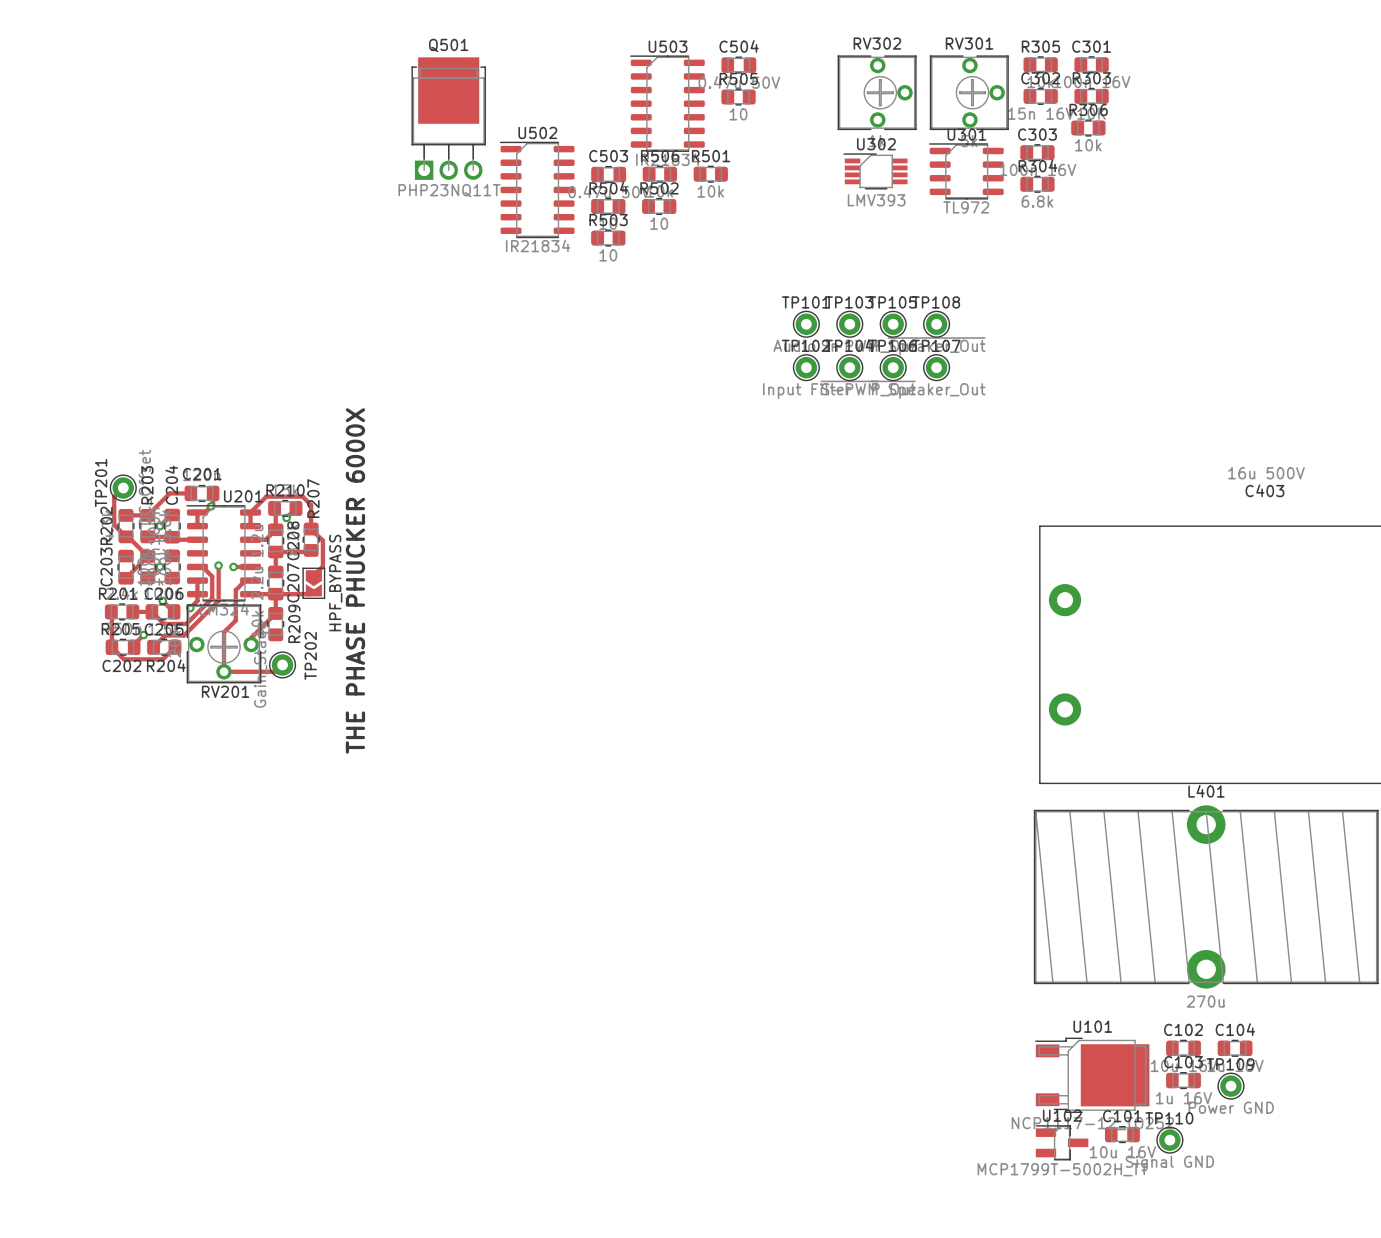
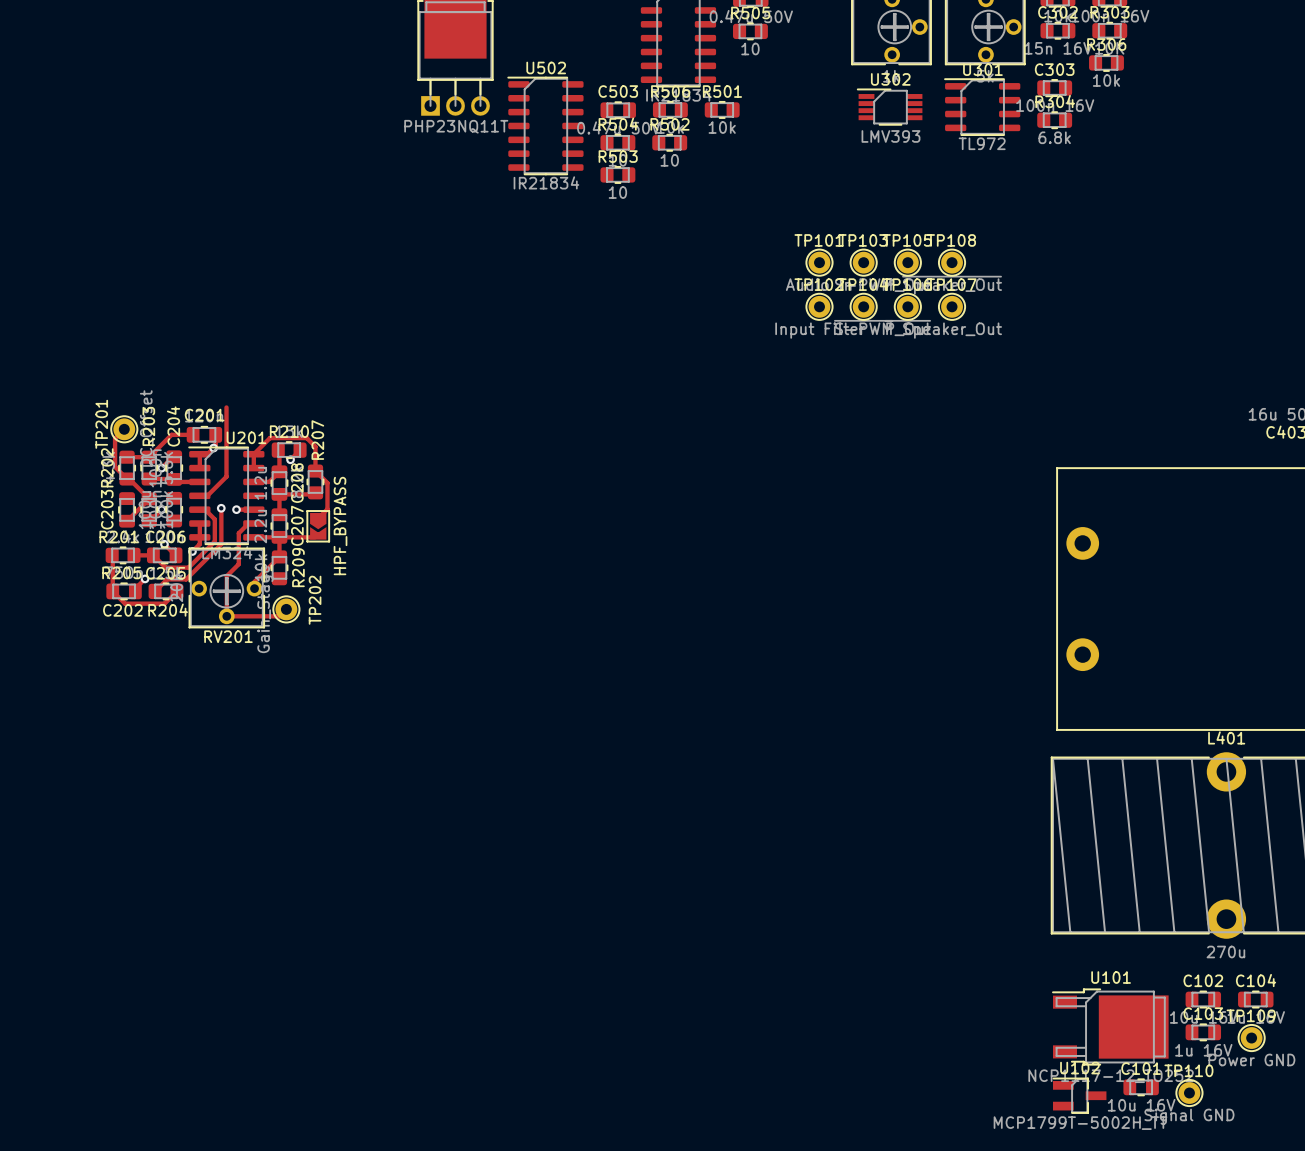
track: none -> (226, 407) (226, 476) (207, 495) (199, 495)
text: THE PHASE PHUCKER 6000X (355, 580) -> none

